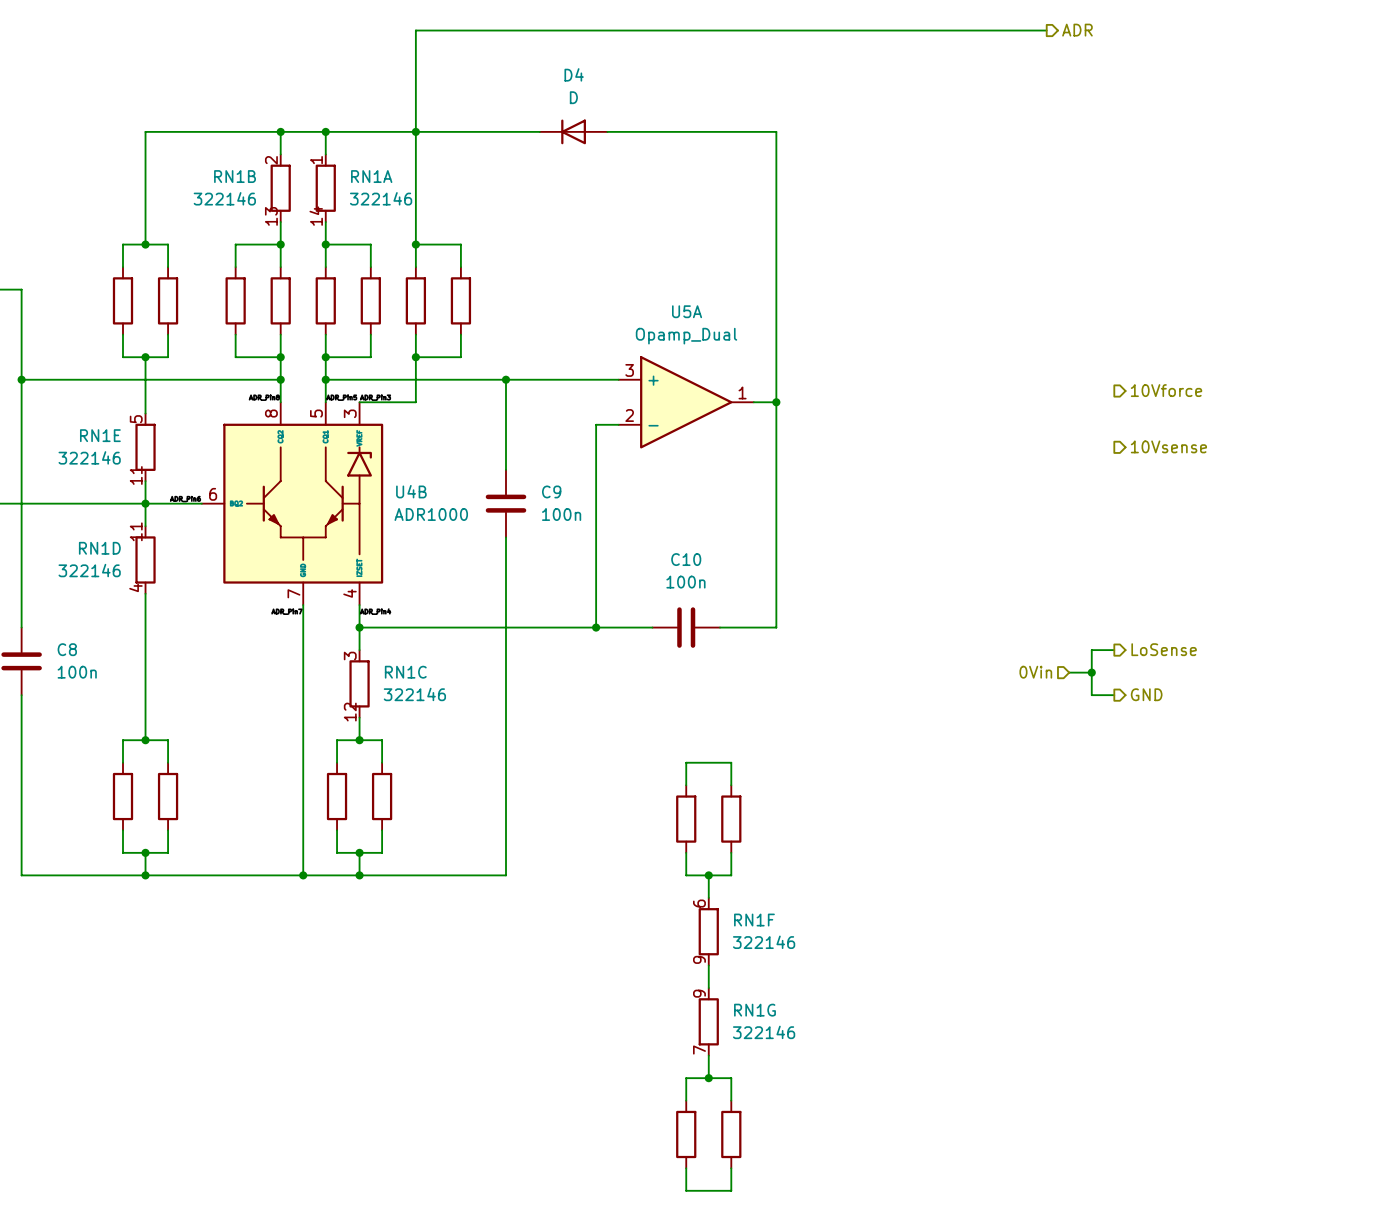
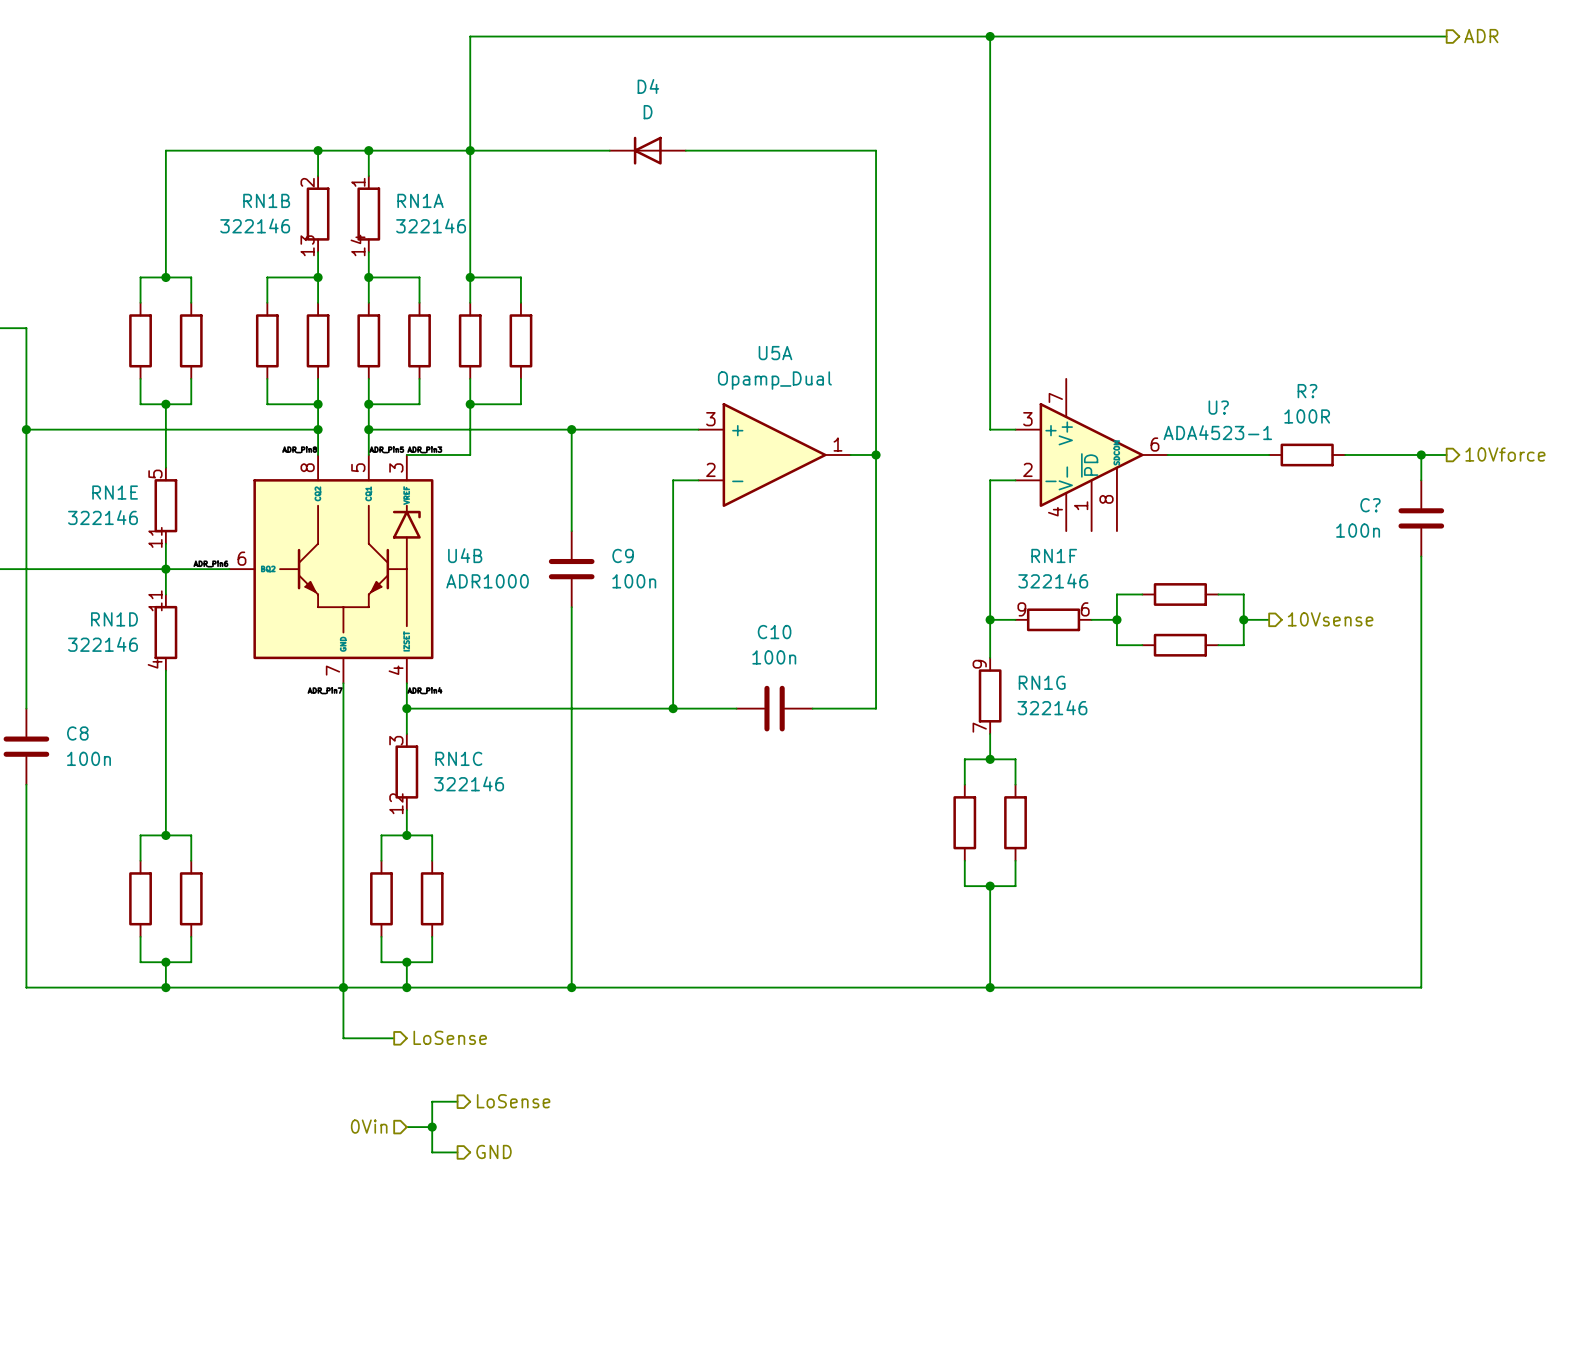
wire: none -> (990, 36) (990, 429) (1015, 429)
junction: none -> (990, 36)
wire: none -> (1180, 36) (1446, 36)
hierarchical label: ADR (1077, 30) -> none
hierarchical label: none -> ADR (1481, 36)
hierarchical label position: 10Vforce (1166, 390) -> 10Vforce (1505, 454)
U?: none -> ADA4523-1 (1091, 454)
wire: none -> (1167, 454) (1269, 454)
R?: none -> 100R (1307, 454)
wire: none -> (1345, 454) (1446, 454)
wire: none -> (1421, 454) (1421, 480)
junction: none -> (1421, 454)
wire: none -> (1015, 480) (990, 480) (990, 657)
hierarchical label position: 10Vsense (1168, 446) -> 10Vsense (1330, 619)
C?: none -> 100n (1421, 518)
part: none -> (1180, 594)
wire: none -> (1218, 594) (1243, 594) (1243, 645) (1218, 645)
wire: none -> (990, 619) (1015, 619)
junction: none -> (990, 619)
junction: none -> (1116, 619)
wire: none -> (1243, 619) (1269, 619)
junction: none -> (1243, 619)
part: none -> (1180, 645)
hierarchical label: LoSense (1164, 649) -> none
wire: none -> (990, 733) (990, 759)
wire: (1114, 650) (1091, 650) (1091, 695) (1114, 695) -> (1142, 594) (1116, 594) (1116, 645) (1142, 645)
junction: none -> (990, 759)
hierarchical label: 0Vin (1035, 672) -> none
wire: (1069, 672) (1091, 672) -> (1091, 619) (1116, 619)
junction: (1091, 672) -> none
hierarchical label: GND (1146, 694) -> none
part: none -> (964, 822)
part: none -> (1015, 822)
wire: none -> (964, 860) (964, 886) (1015, 886) (1015, 860)
wire: (686, 785) (686, 762) (731, 762) (731, 785) -> (964, 784) (964, 759) (1015, 759) (1015, 784)
wire: none -> (990, 886) (990, 987)
junction: none -> (990, 886)
part: (686, 819) -> none
part: (731, 819) -> none
wire: (686, 852) (686, 875) -> (571, 987) (774, 987)
wire: (731, 852) (731, 875) -> (1421, 556) (1421, 987) (825, 987)
wire: none -> (343, 987) (343, 1038) (394, 1038)
junction: none -> (571, 987)
wire: (708, 875) (708, 897) -> none
junction: (708, 875) -> none
junction: none -> (990, 987)
hierarchical label: none -> LoSense (450, 1037)
RN1F name position: RN1F (754, 920) -> RN1F (1054, 555)
RN1F rotation: 0° (708, 931) -> 90° clockwise (1053, 619)
RN1F position: (708, 931) -> (1053, 619)
RN1F value position: 322146 (764, 942) -> 322146 (1053, 581)
wire: (708, 965) (708, 988) -> none
wire: none -> (457, 1101) (432, 1101) (432, 1152) (457, 1152)
hierarchical label: none -> LoSense (513, 1101)
hierarchical label: none -> 0Vin (369, 1126)
wire: none -> (406, 1127) (432, 1127)
junction: none -> (432, 1127)
hierarchical label: none -> GND (493, 1151)
RN1G position: (708, 1021) -> (990, 695)
wire: (708, 1055) (708, 1078) -> none
junction: (708, 1078) -> none
wire: (686, 1100) (686, 1078) (731, 1078) (731, 1100) -> none
part: (686, 1134) -> none
part: (731, 1134) -> none
wire: (686, 1168) (686, 1190) (731, 1190) (731, 1168) -> none

